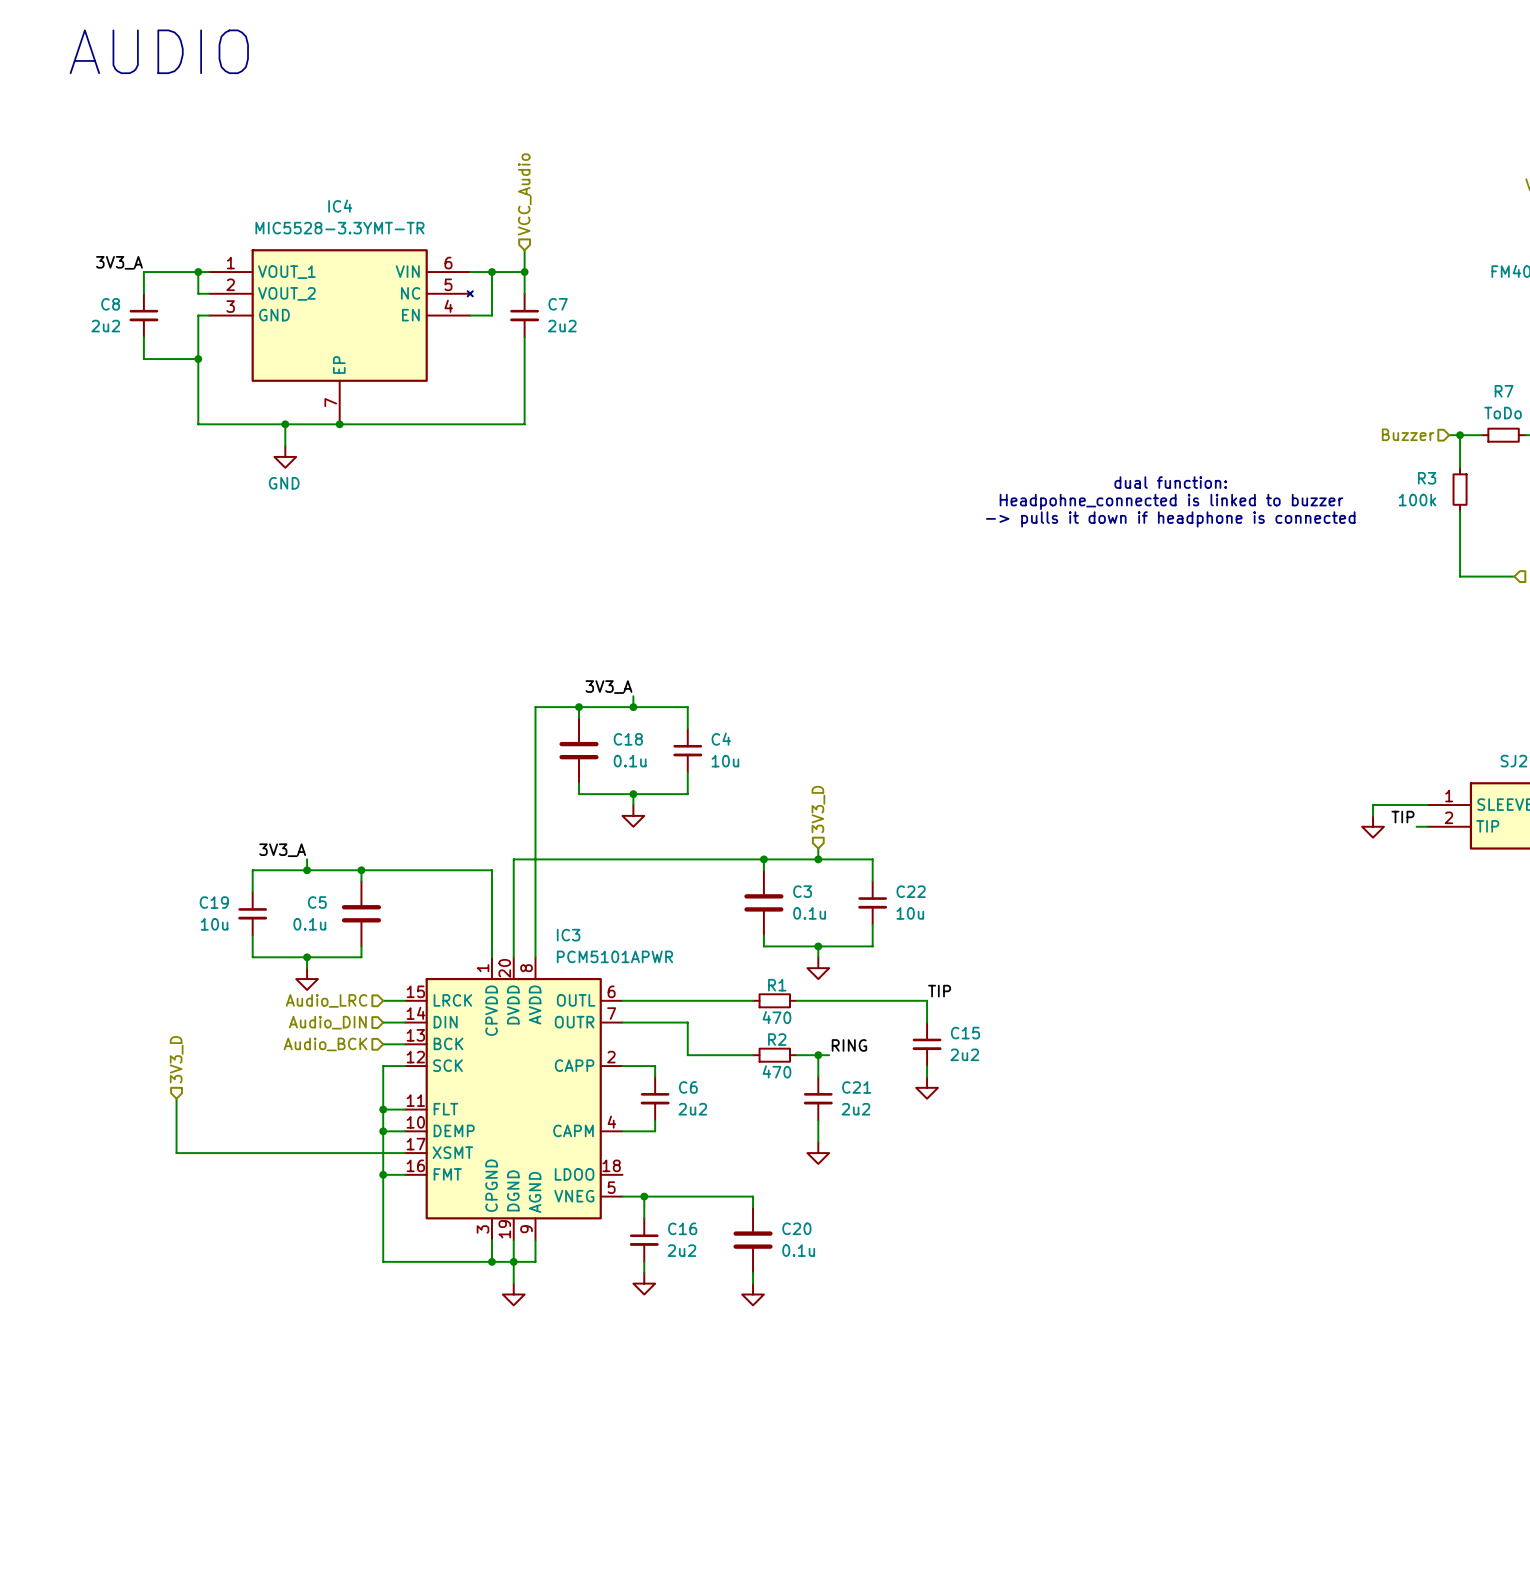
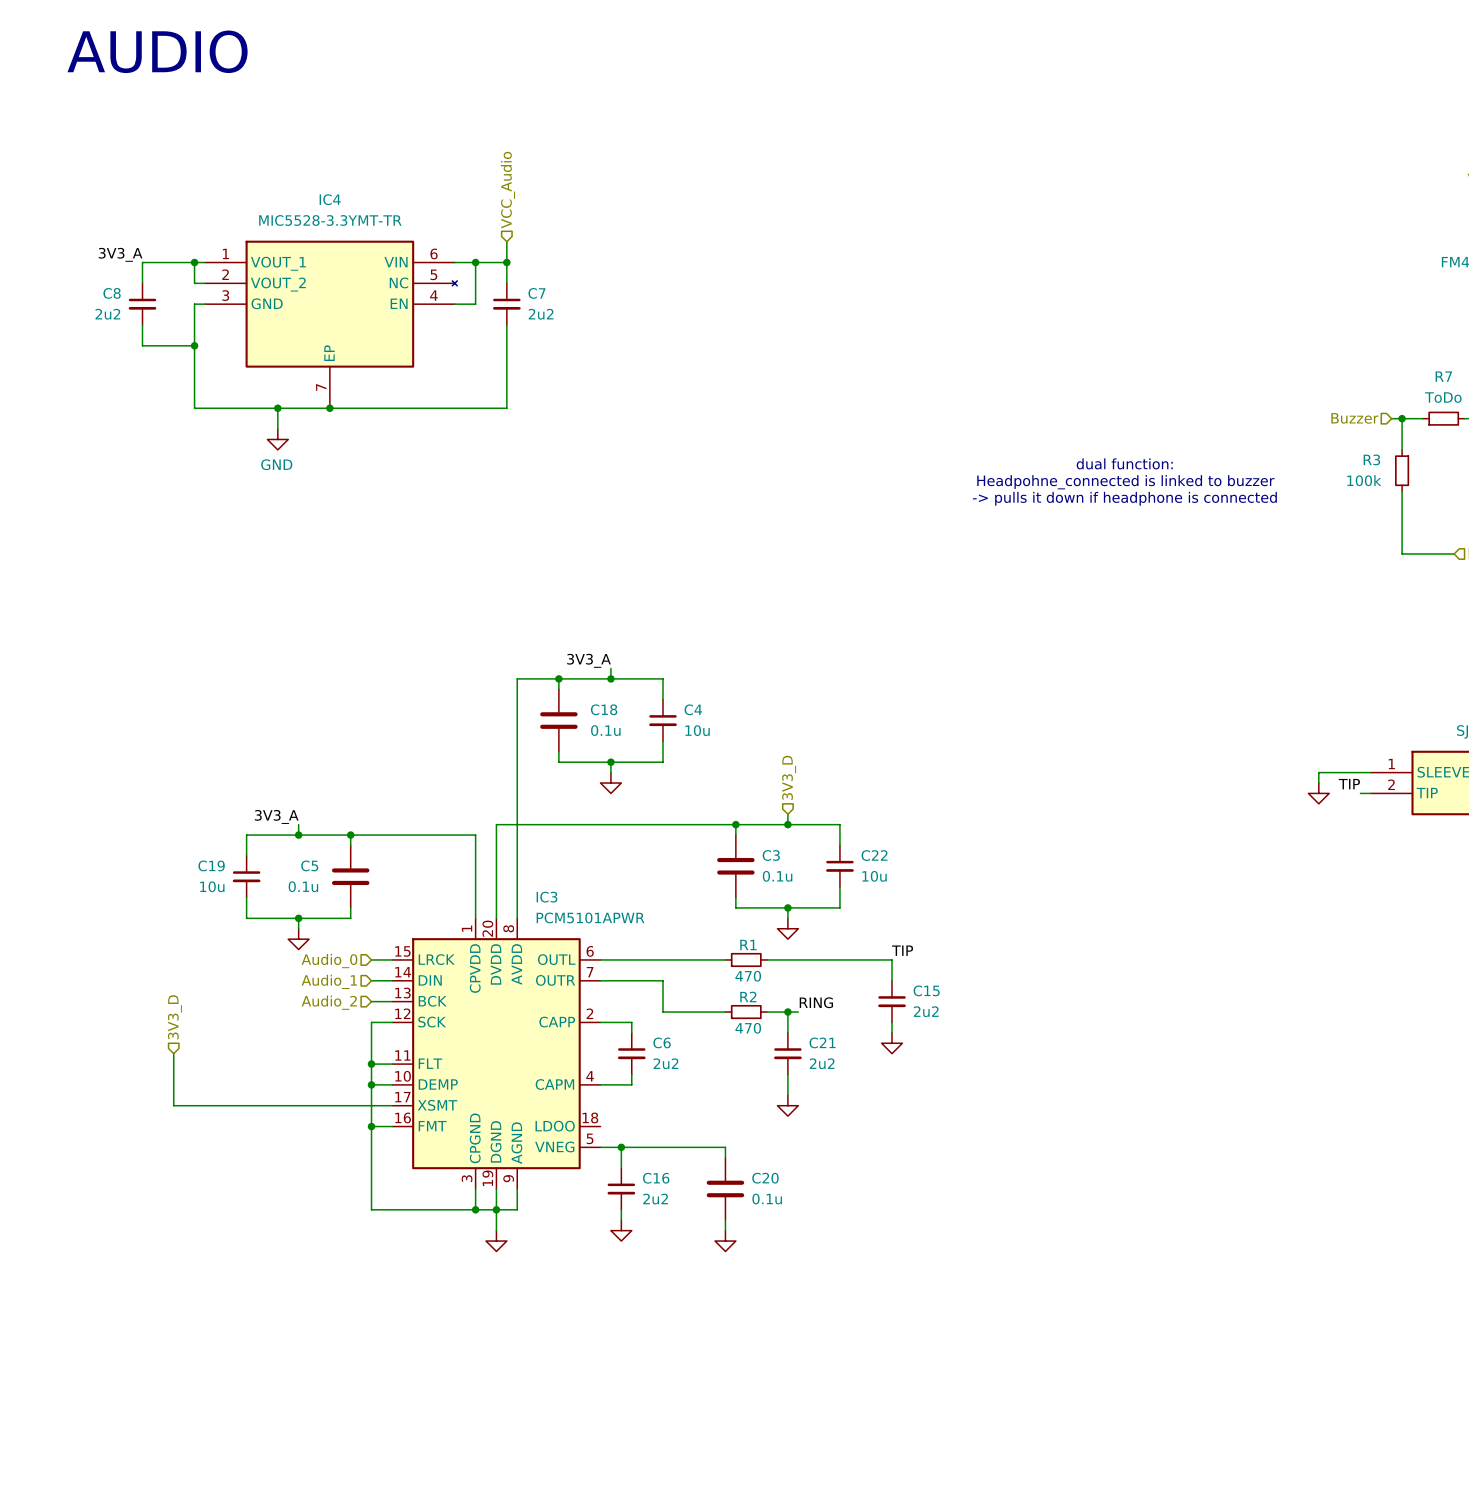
hierarchical label: Audio_LRC (326, 1000) -> Audio_0 (329, 961)
hierarchical label: Audio_DIN (327, 1022) -> Audio_1 (329, 981)
hierarchical label: Audio_BCK (325, 1044) -> Audio_2 (329, 1002)

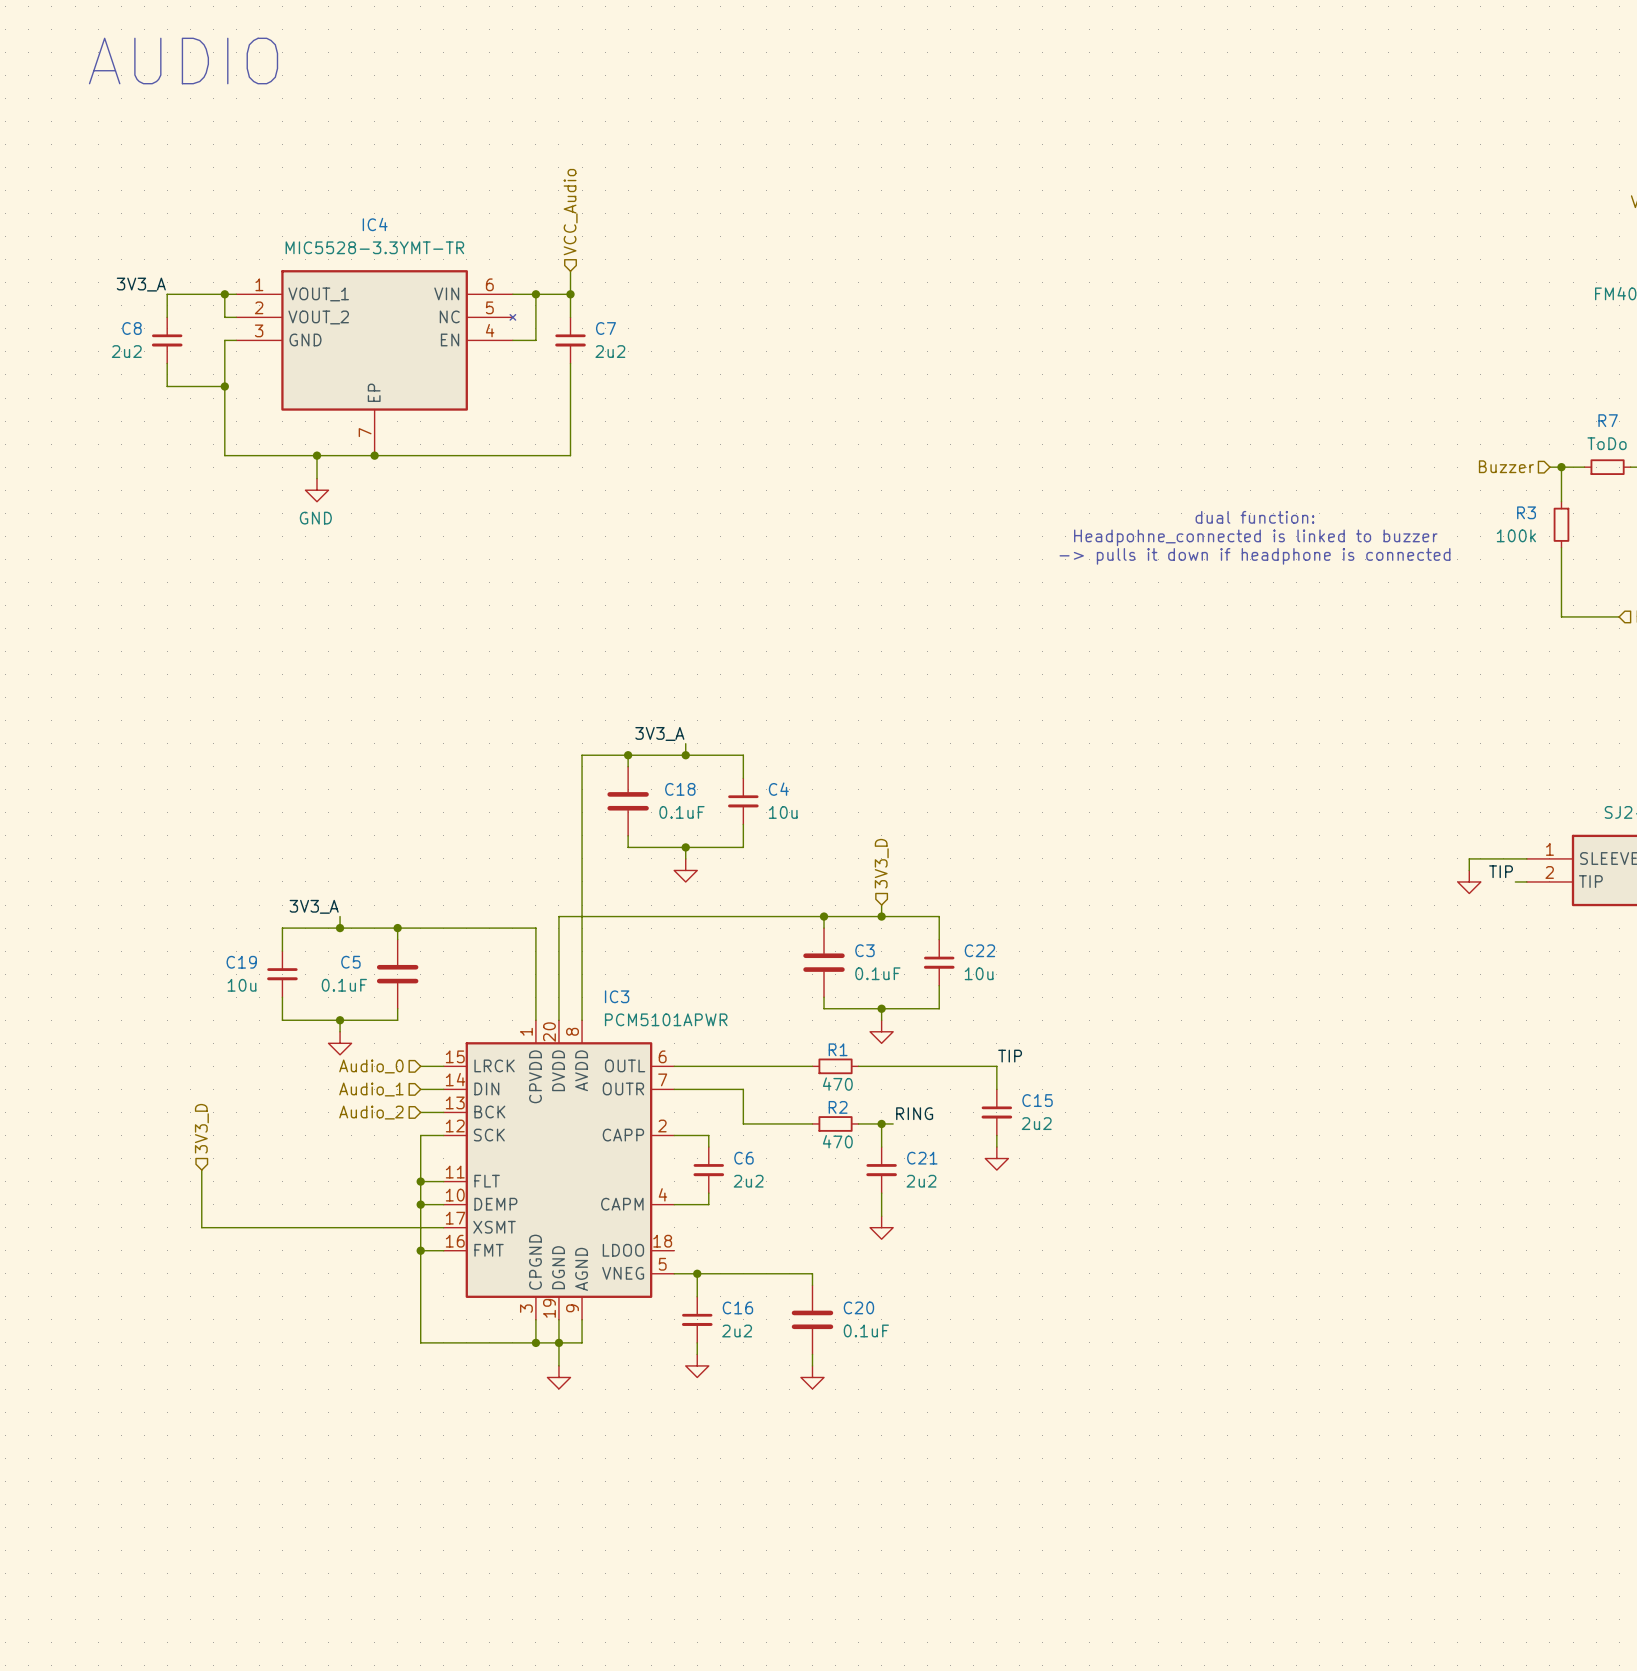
C18 value: 0.1u (605, 730) -> 0.1uF (681, 812)
C3 value: 0.1u (777, 876) -> 0.1uF (877, 973)
C5 value: 0.1u (303, 886) -> 0.1uF (344, 985)
C20 value: 0.1u (767, 1199) -> 0.1uF (866, 1330)

